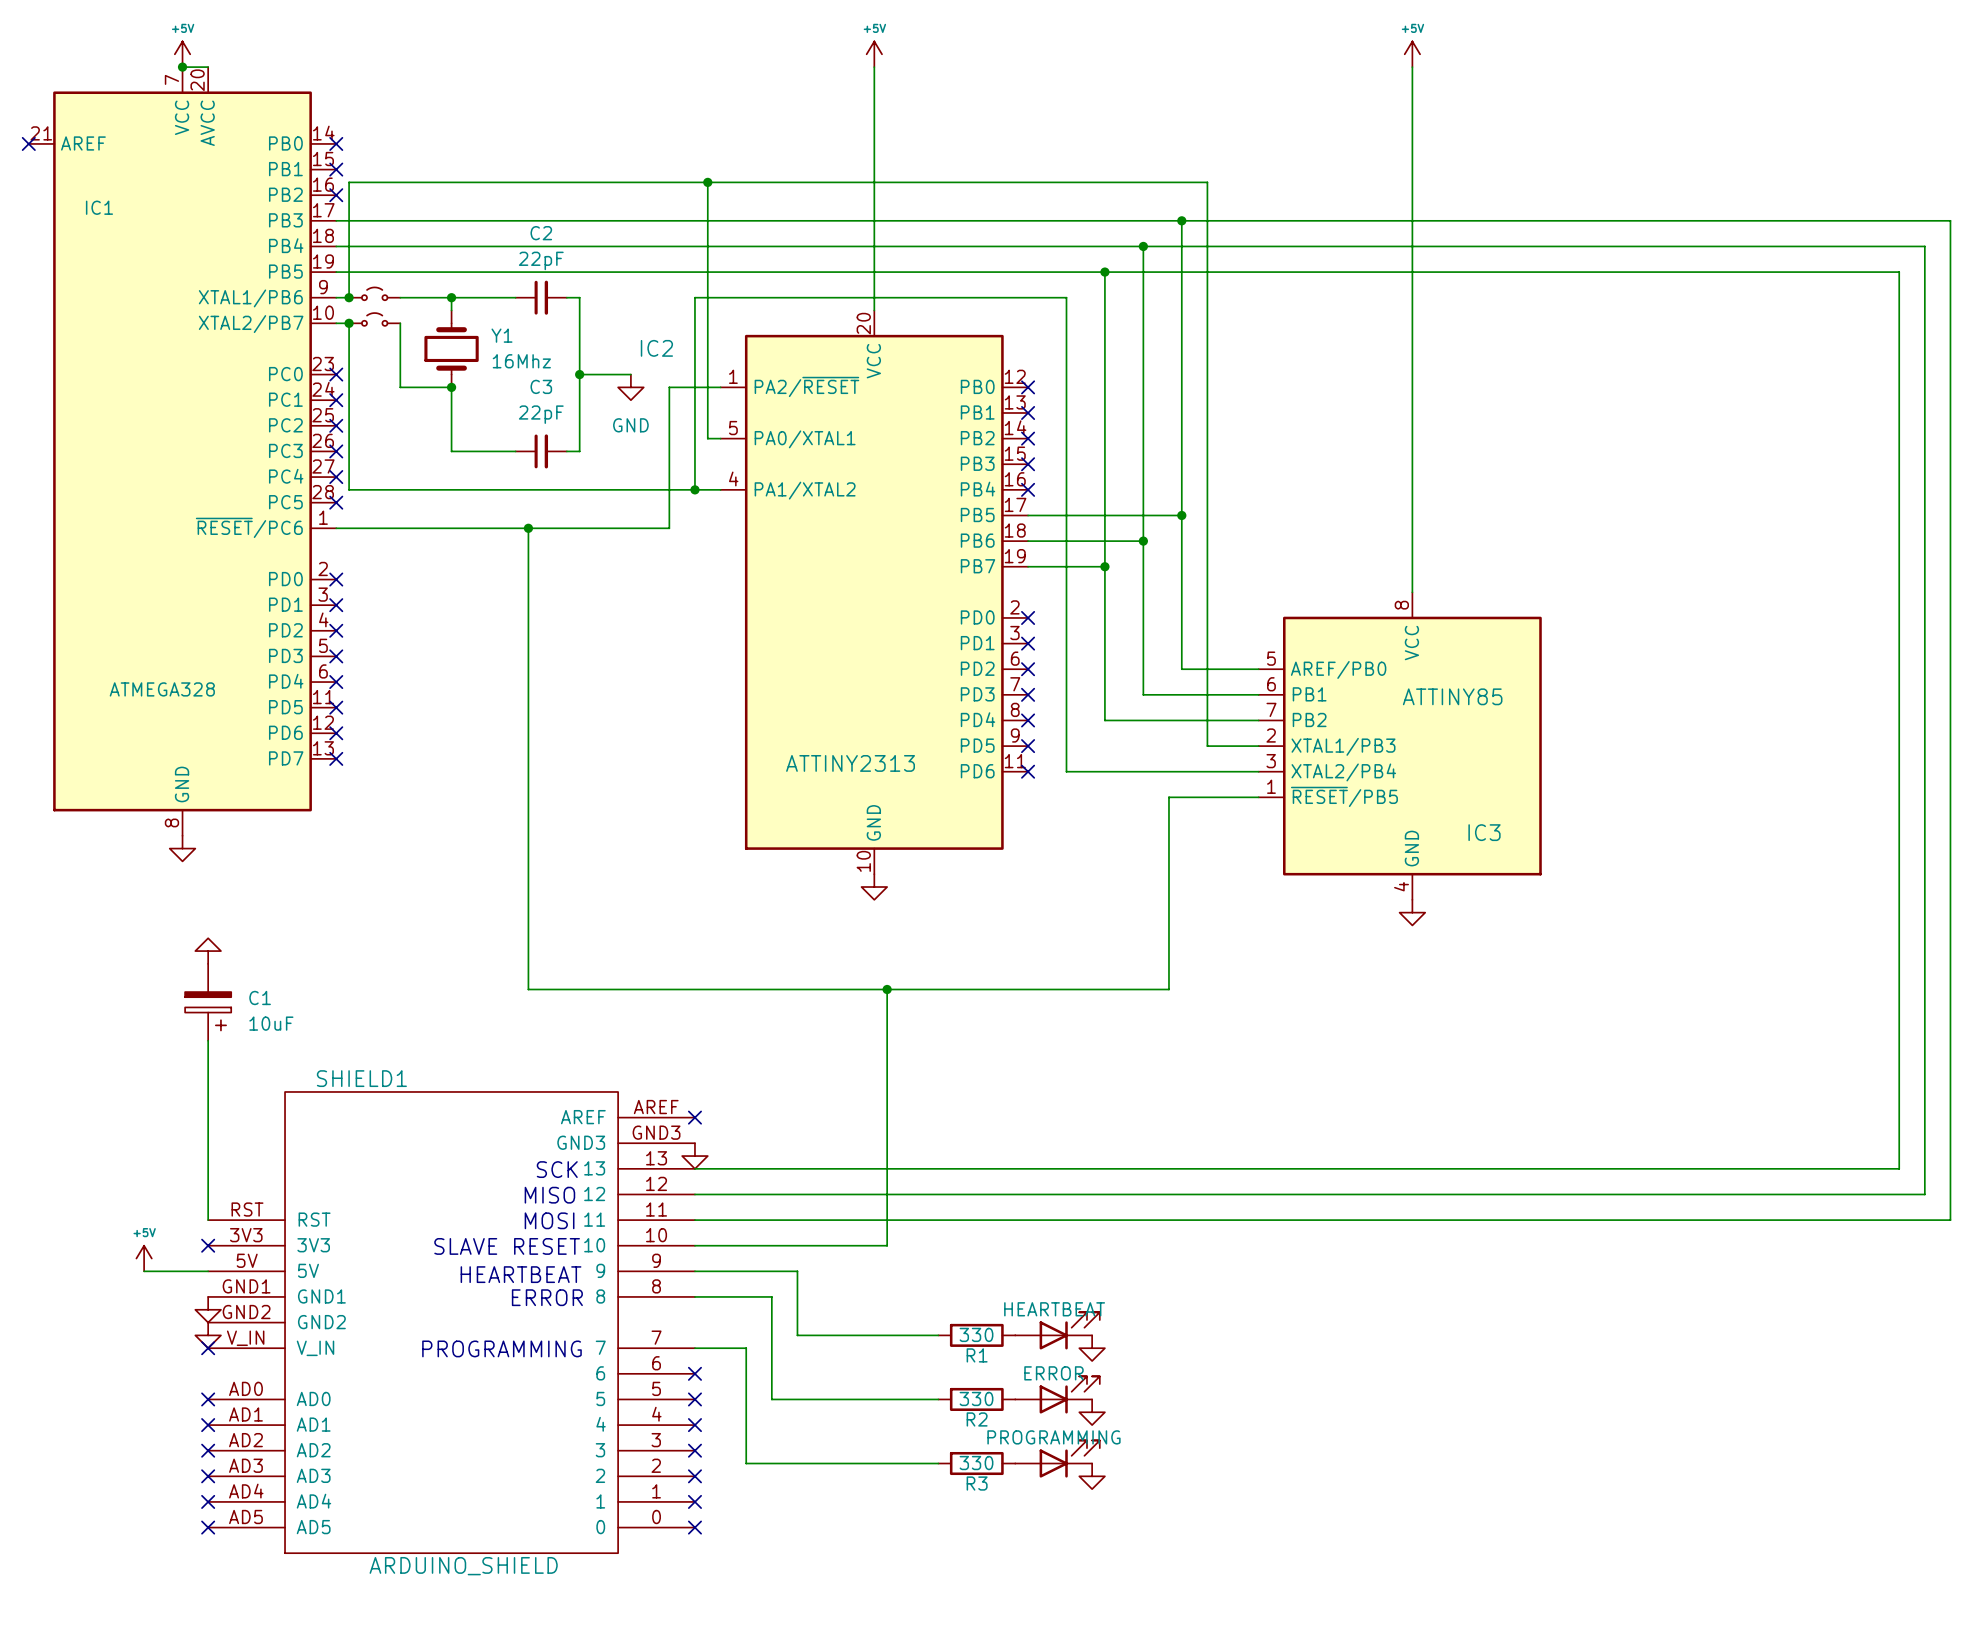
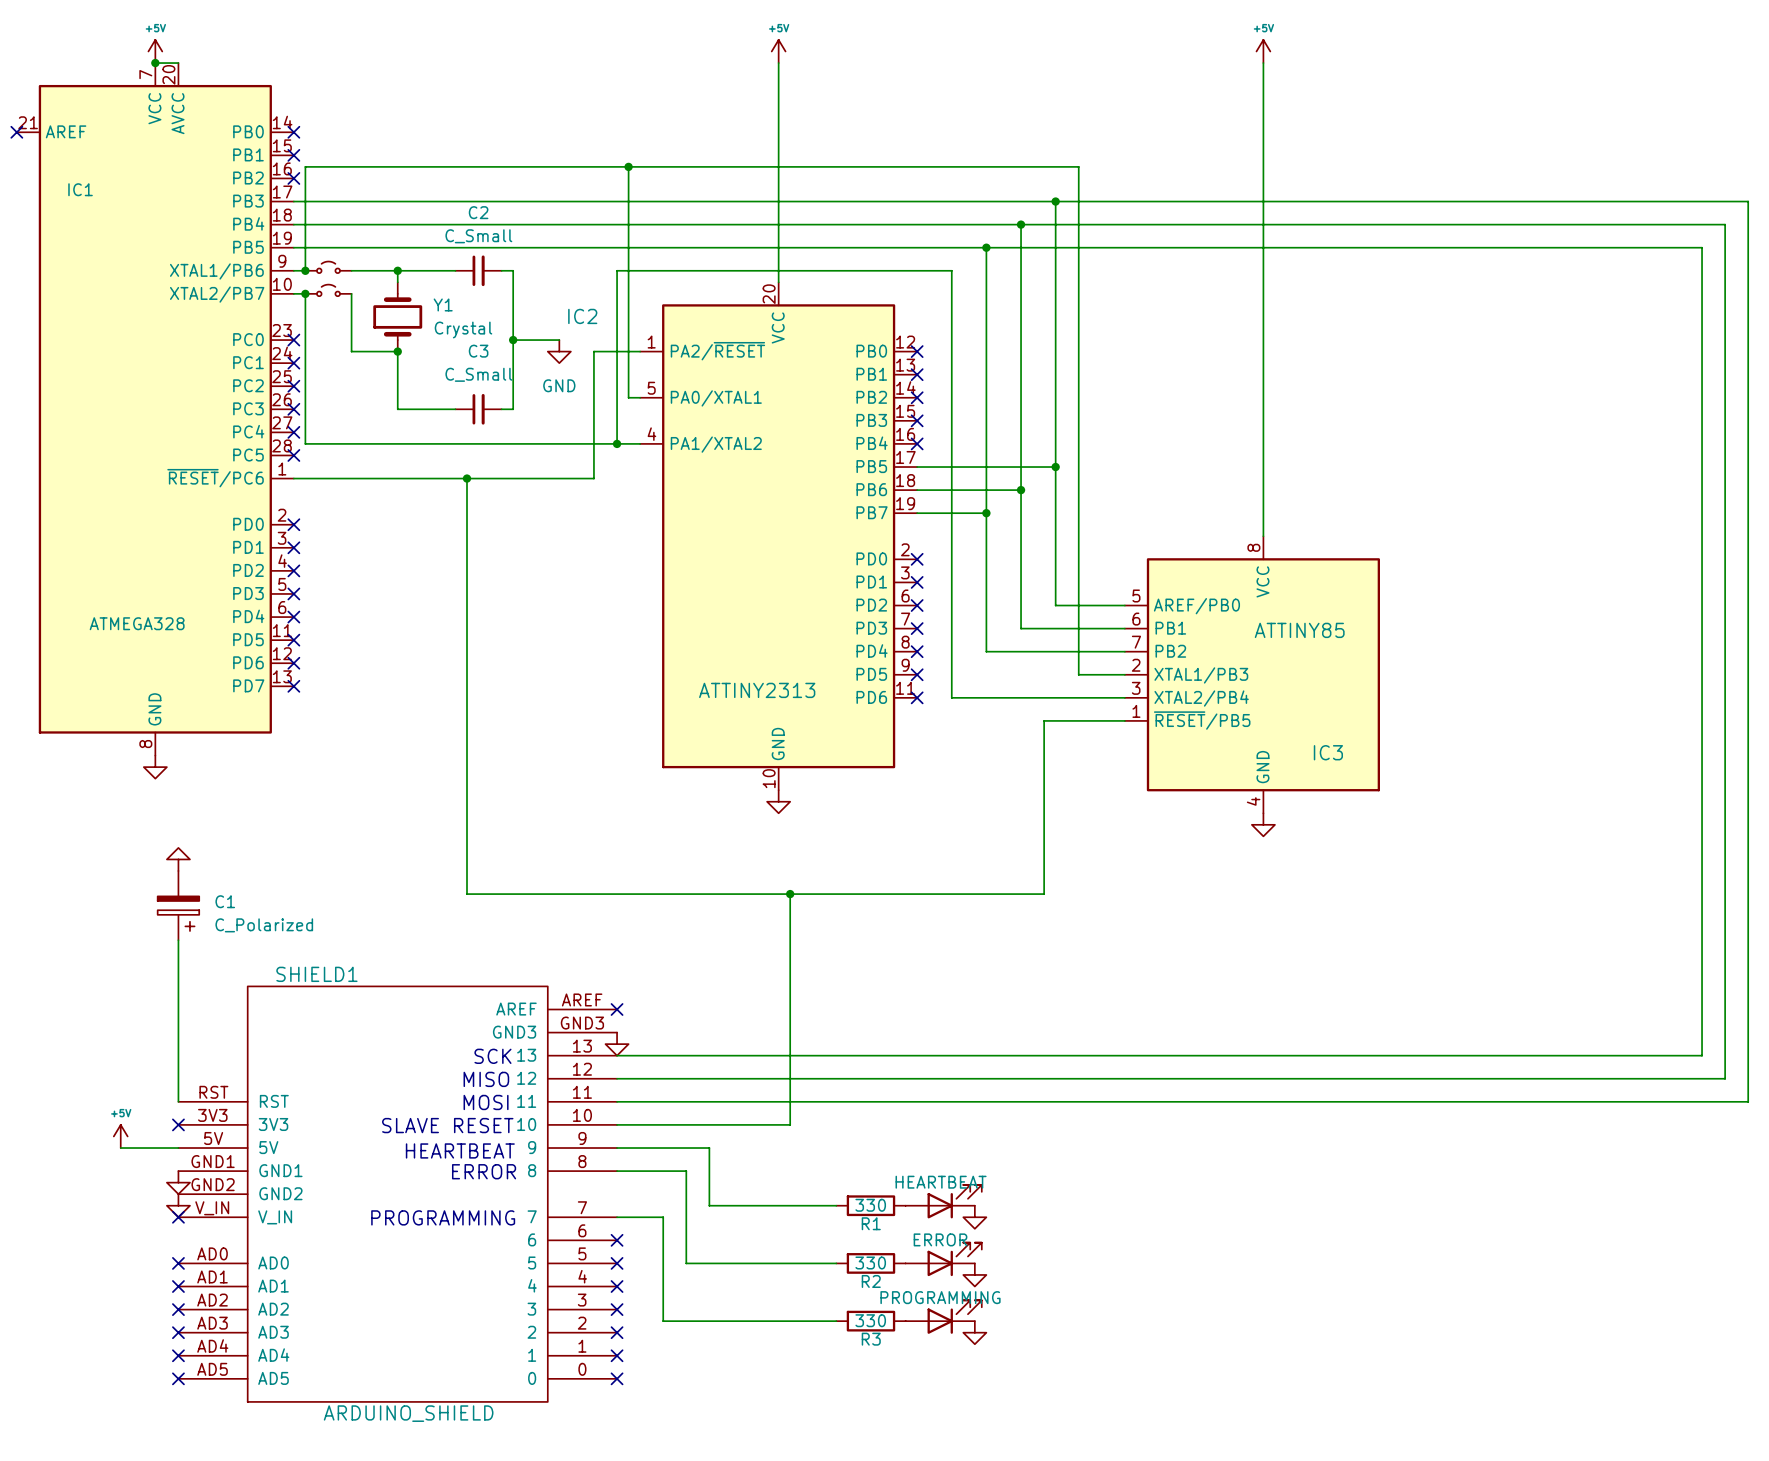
C2 value: 22pF (541, 260) -> C_Small (478, 236)
Y1 value: 16Mhz (521, 361) -> Crystal (463, 329)
C3 value: 22pF (541, 414) -> C_Small (478, 374)
C1 value: 10uF (271, 1023) -> C_Polarized (264, 925)

